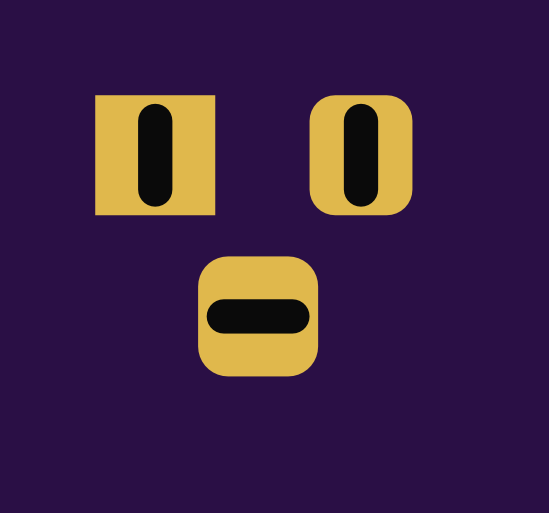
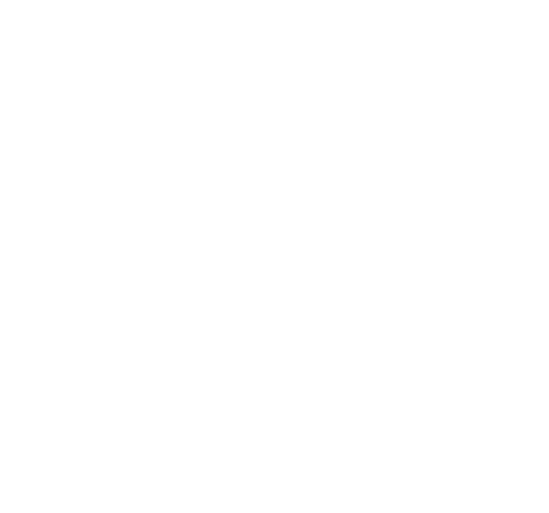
part: (253, 235) -> none

